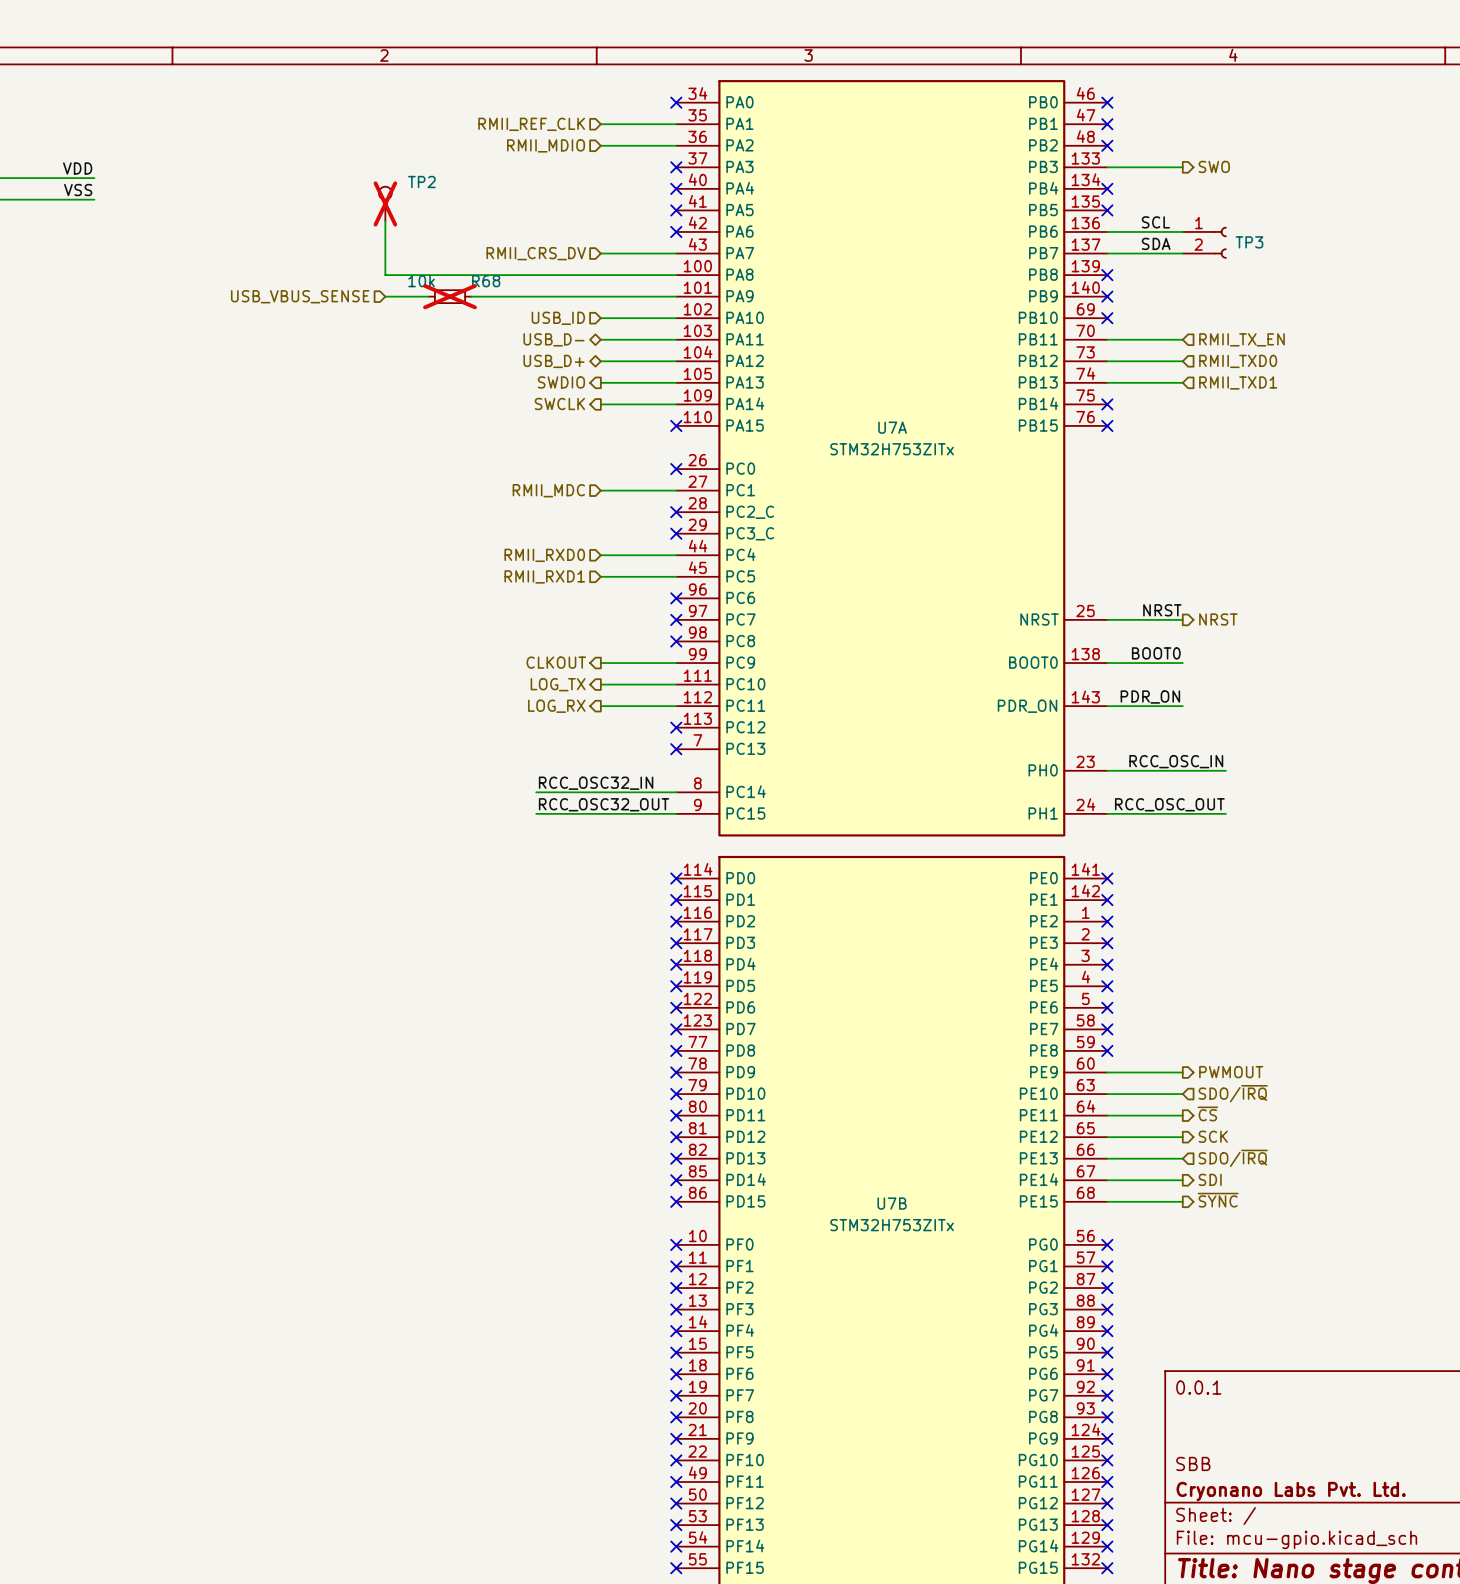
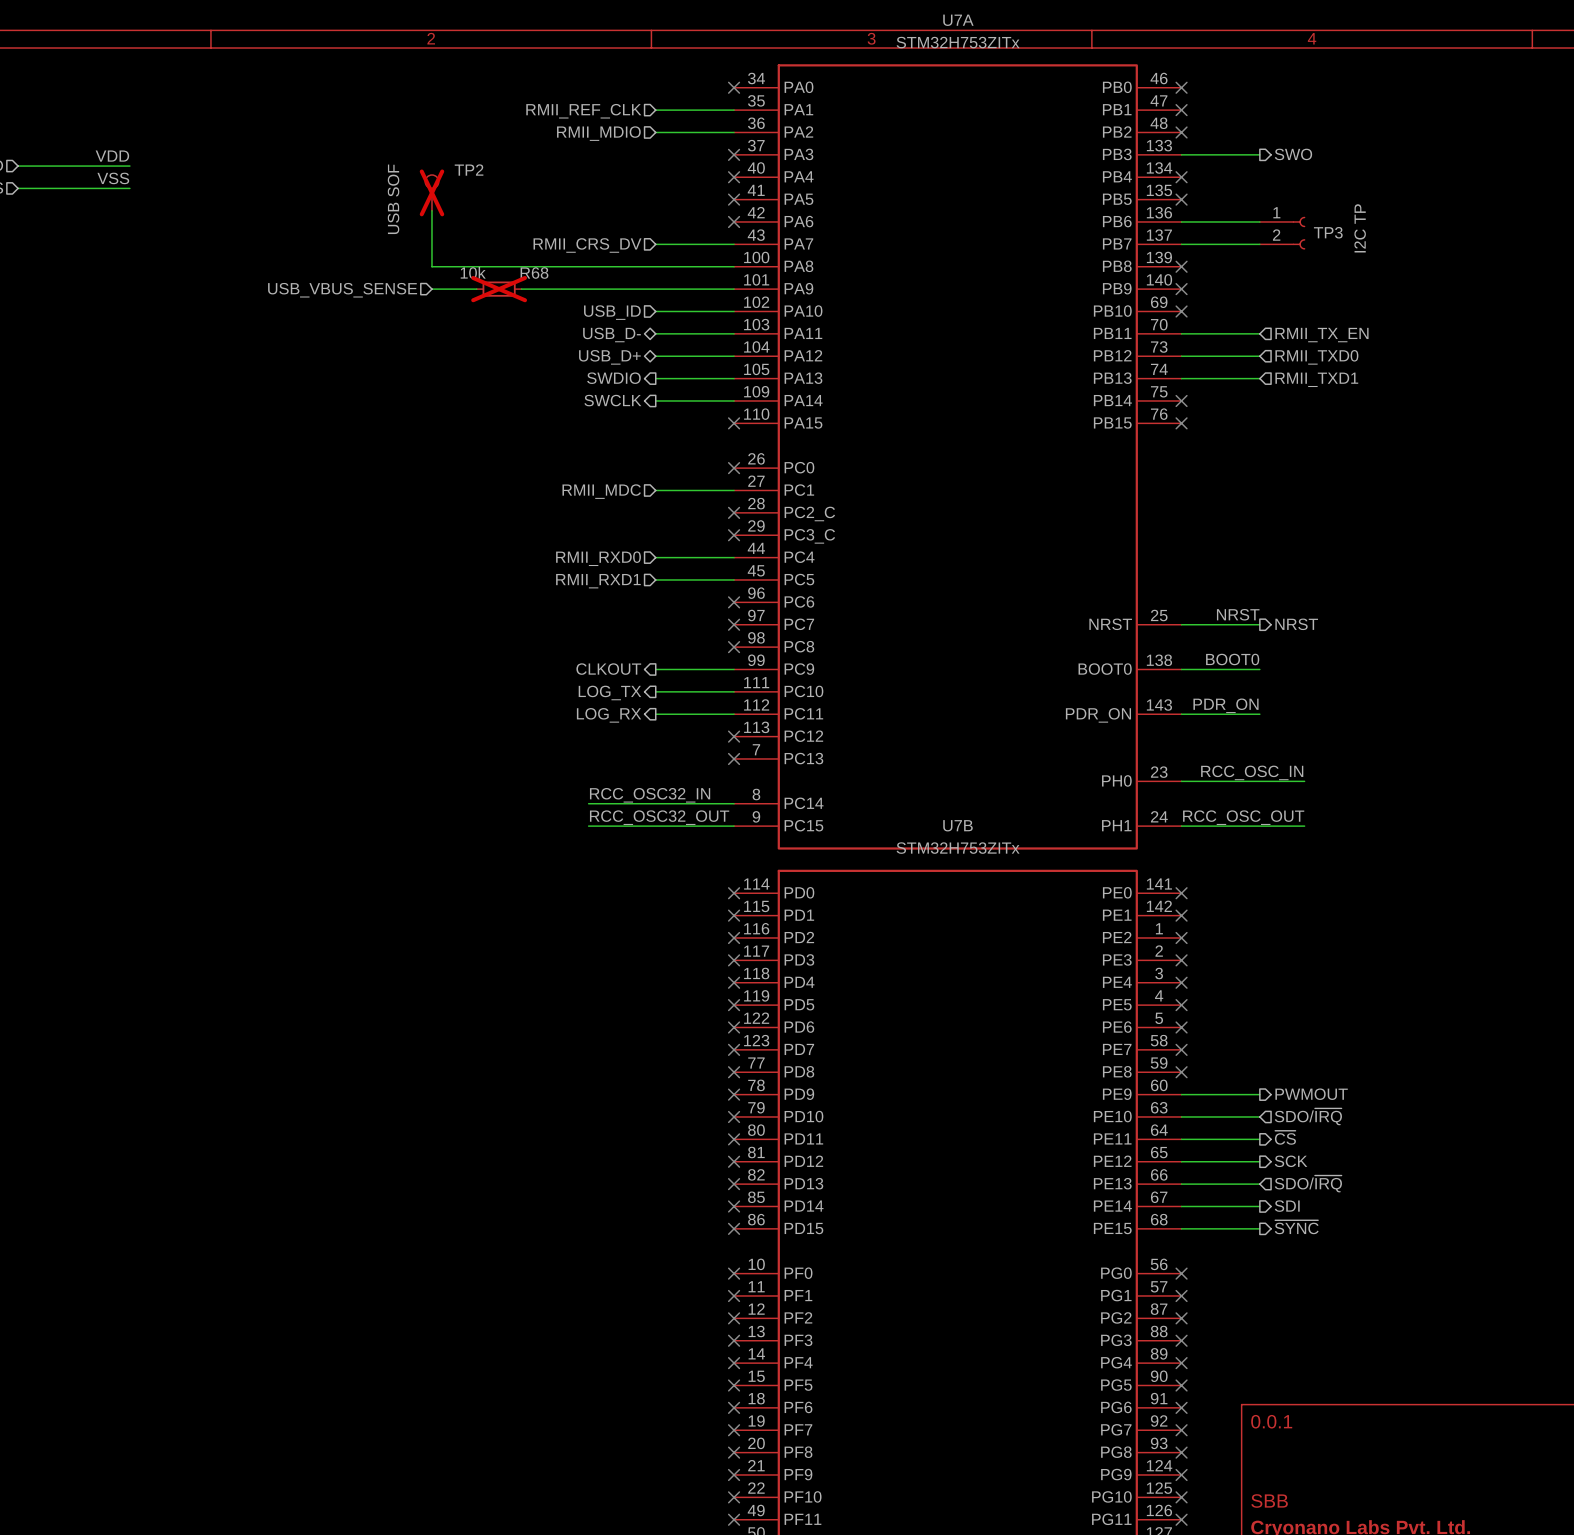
TP2 text: none -> USB SOF (393, 199)
label: SCL (1155, 222) -> none
TP3 text: none -> I2C TP (1360, 228)
label: SDA (1156, 243) -> none
U7A name position: U7A (892, 427) -> U7A (958, 20)
U7A value position: STM32H753ZITx (892, 449) -> STM32H753ZITx (958, 42)
U7B name position: U7B (892, 1203) -> U7B (958, 825)
U7B value position: STM32H753ZITx (892, 1225) -> STM32H753ZITx (958, 848)

